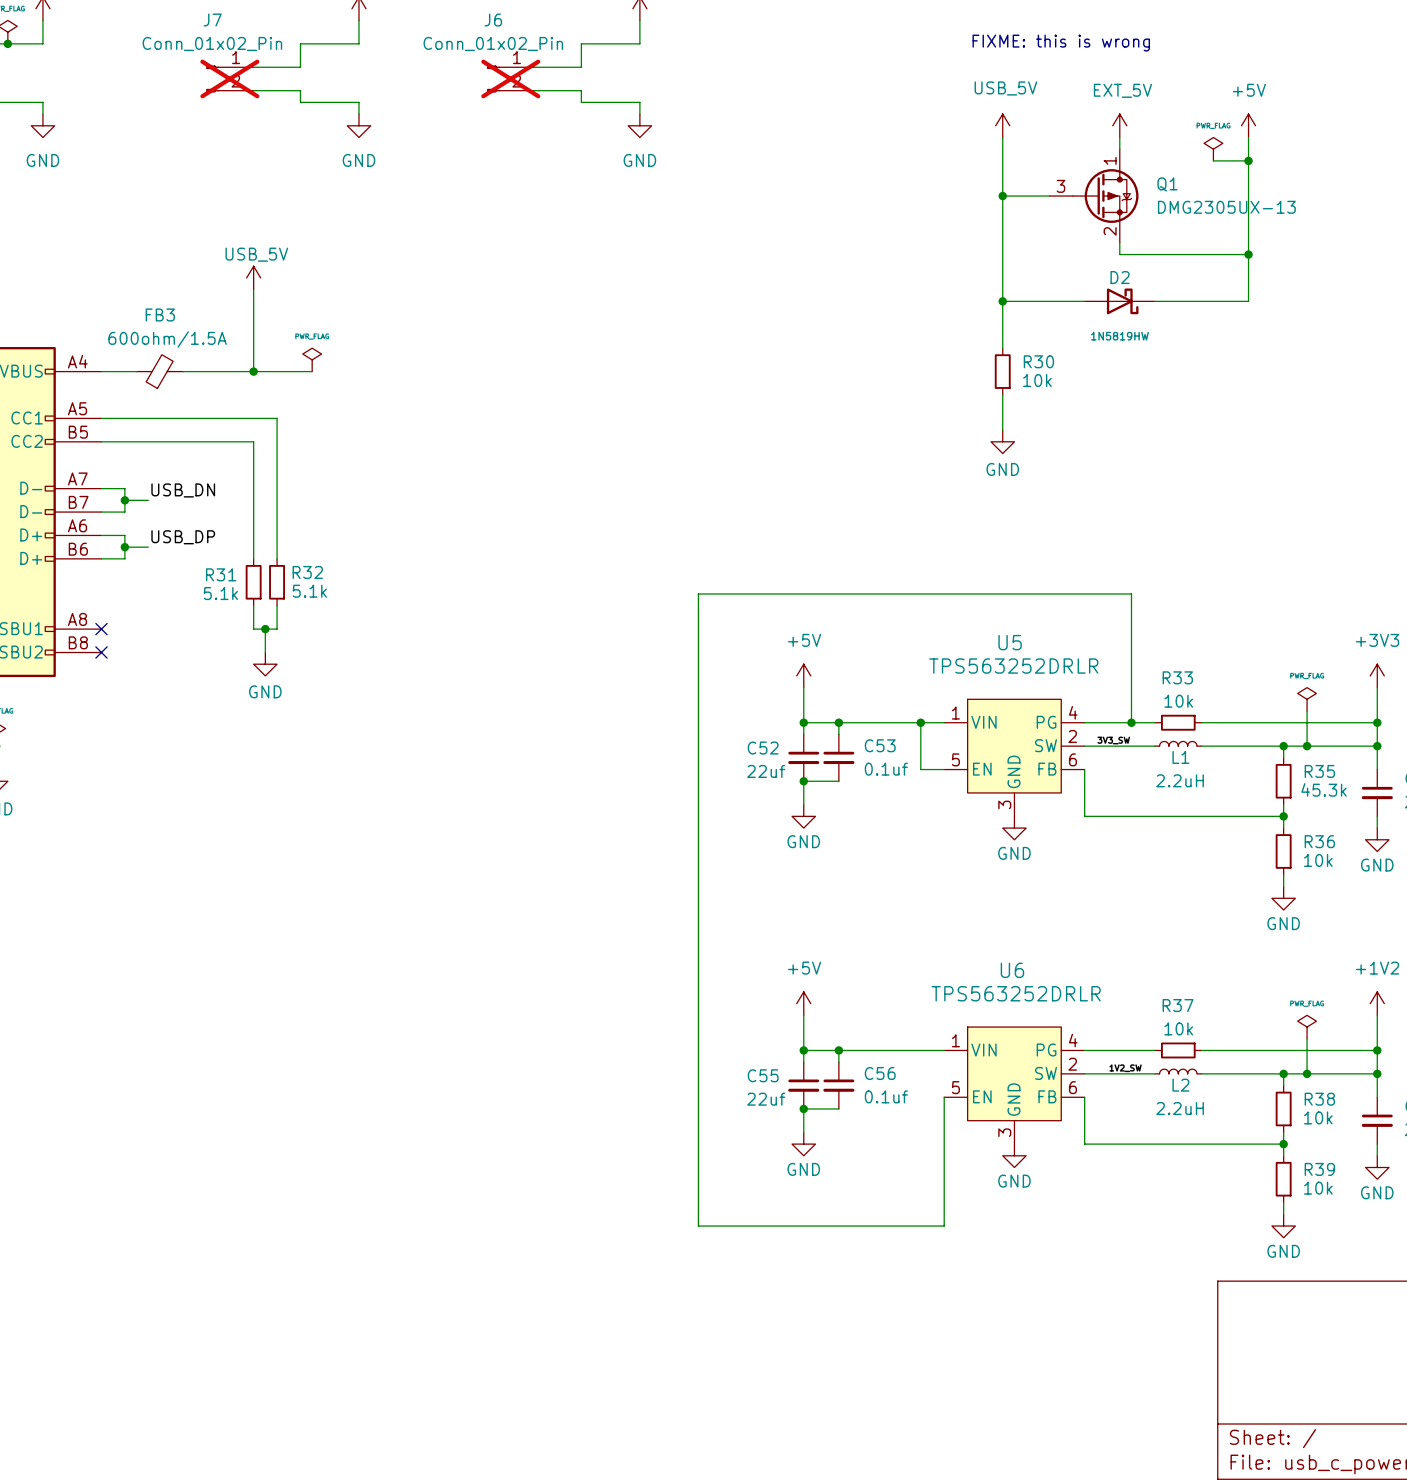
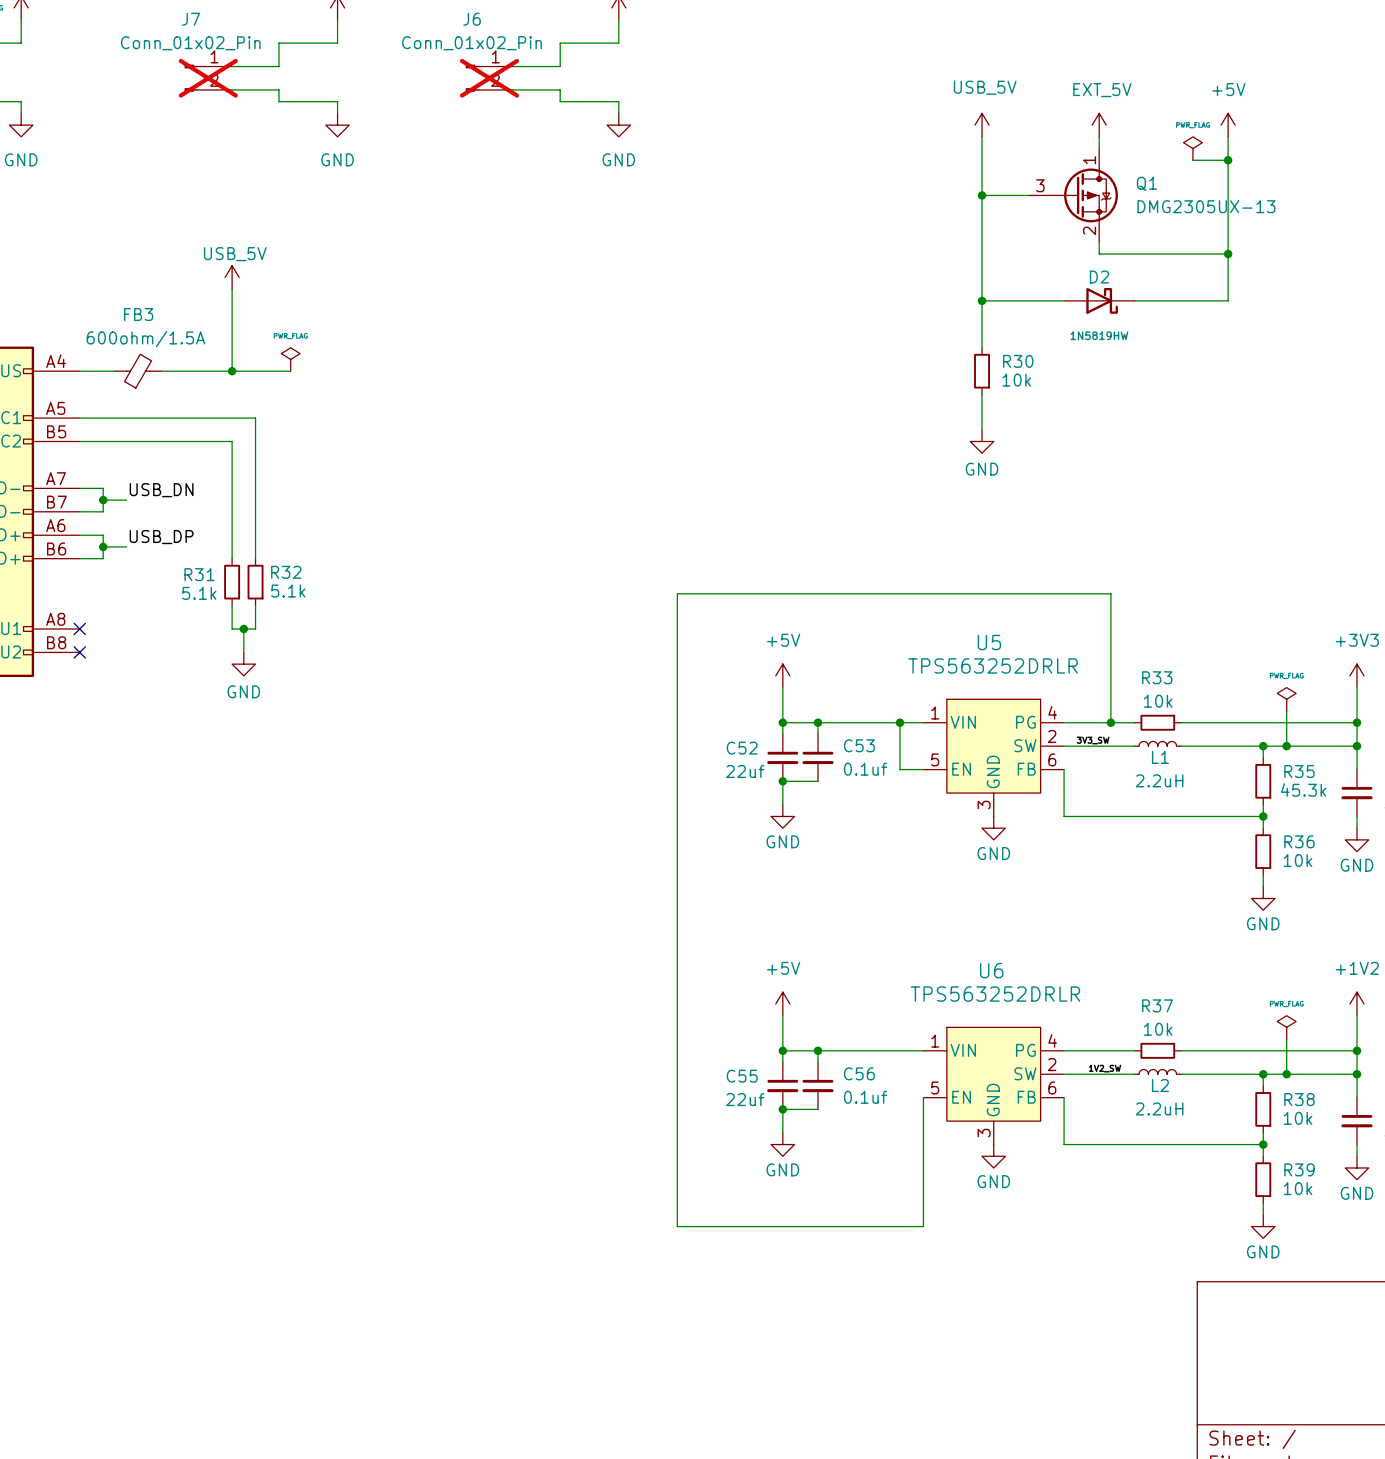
text: FIXME: this is wrong (1061, 43) -> none

